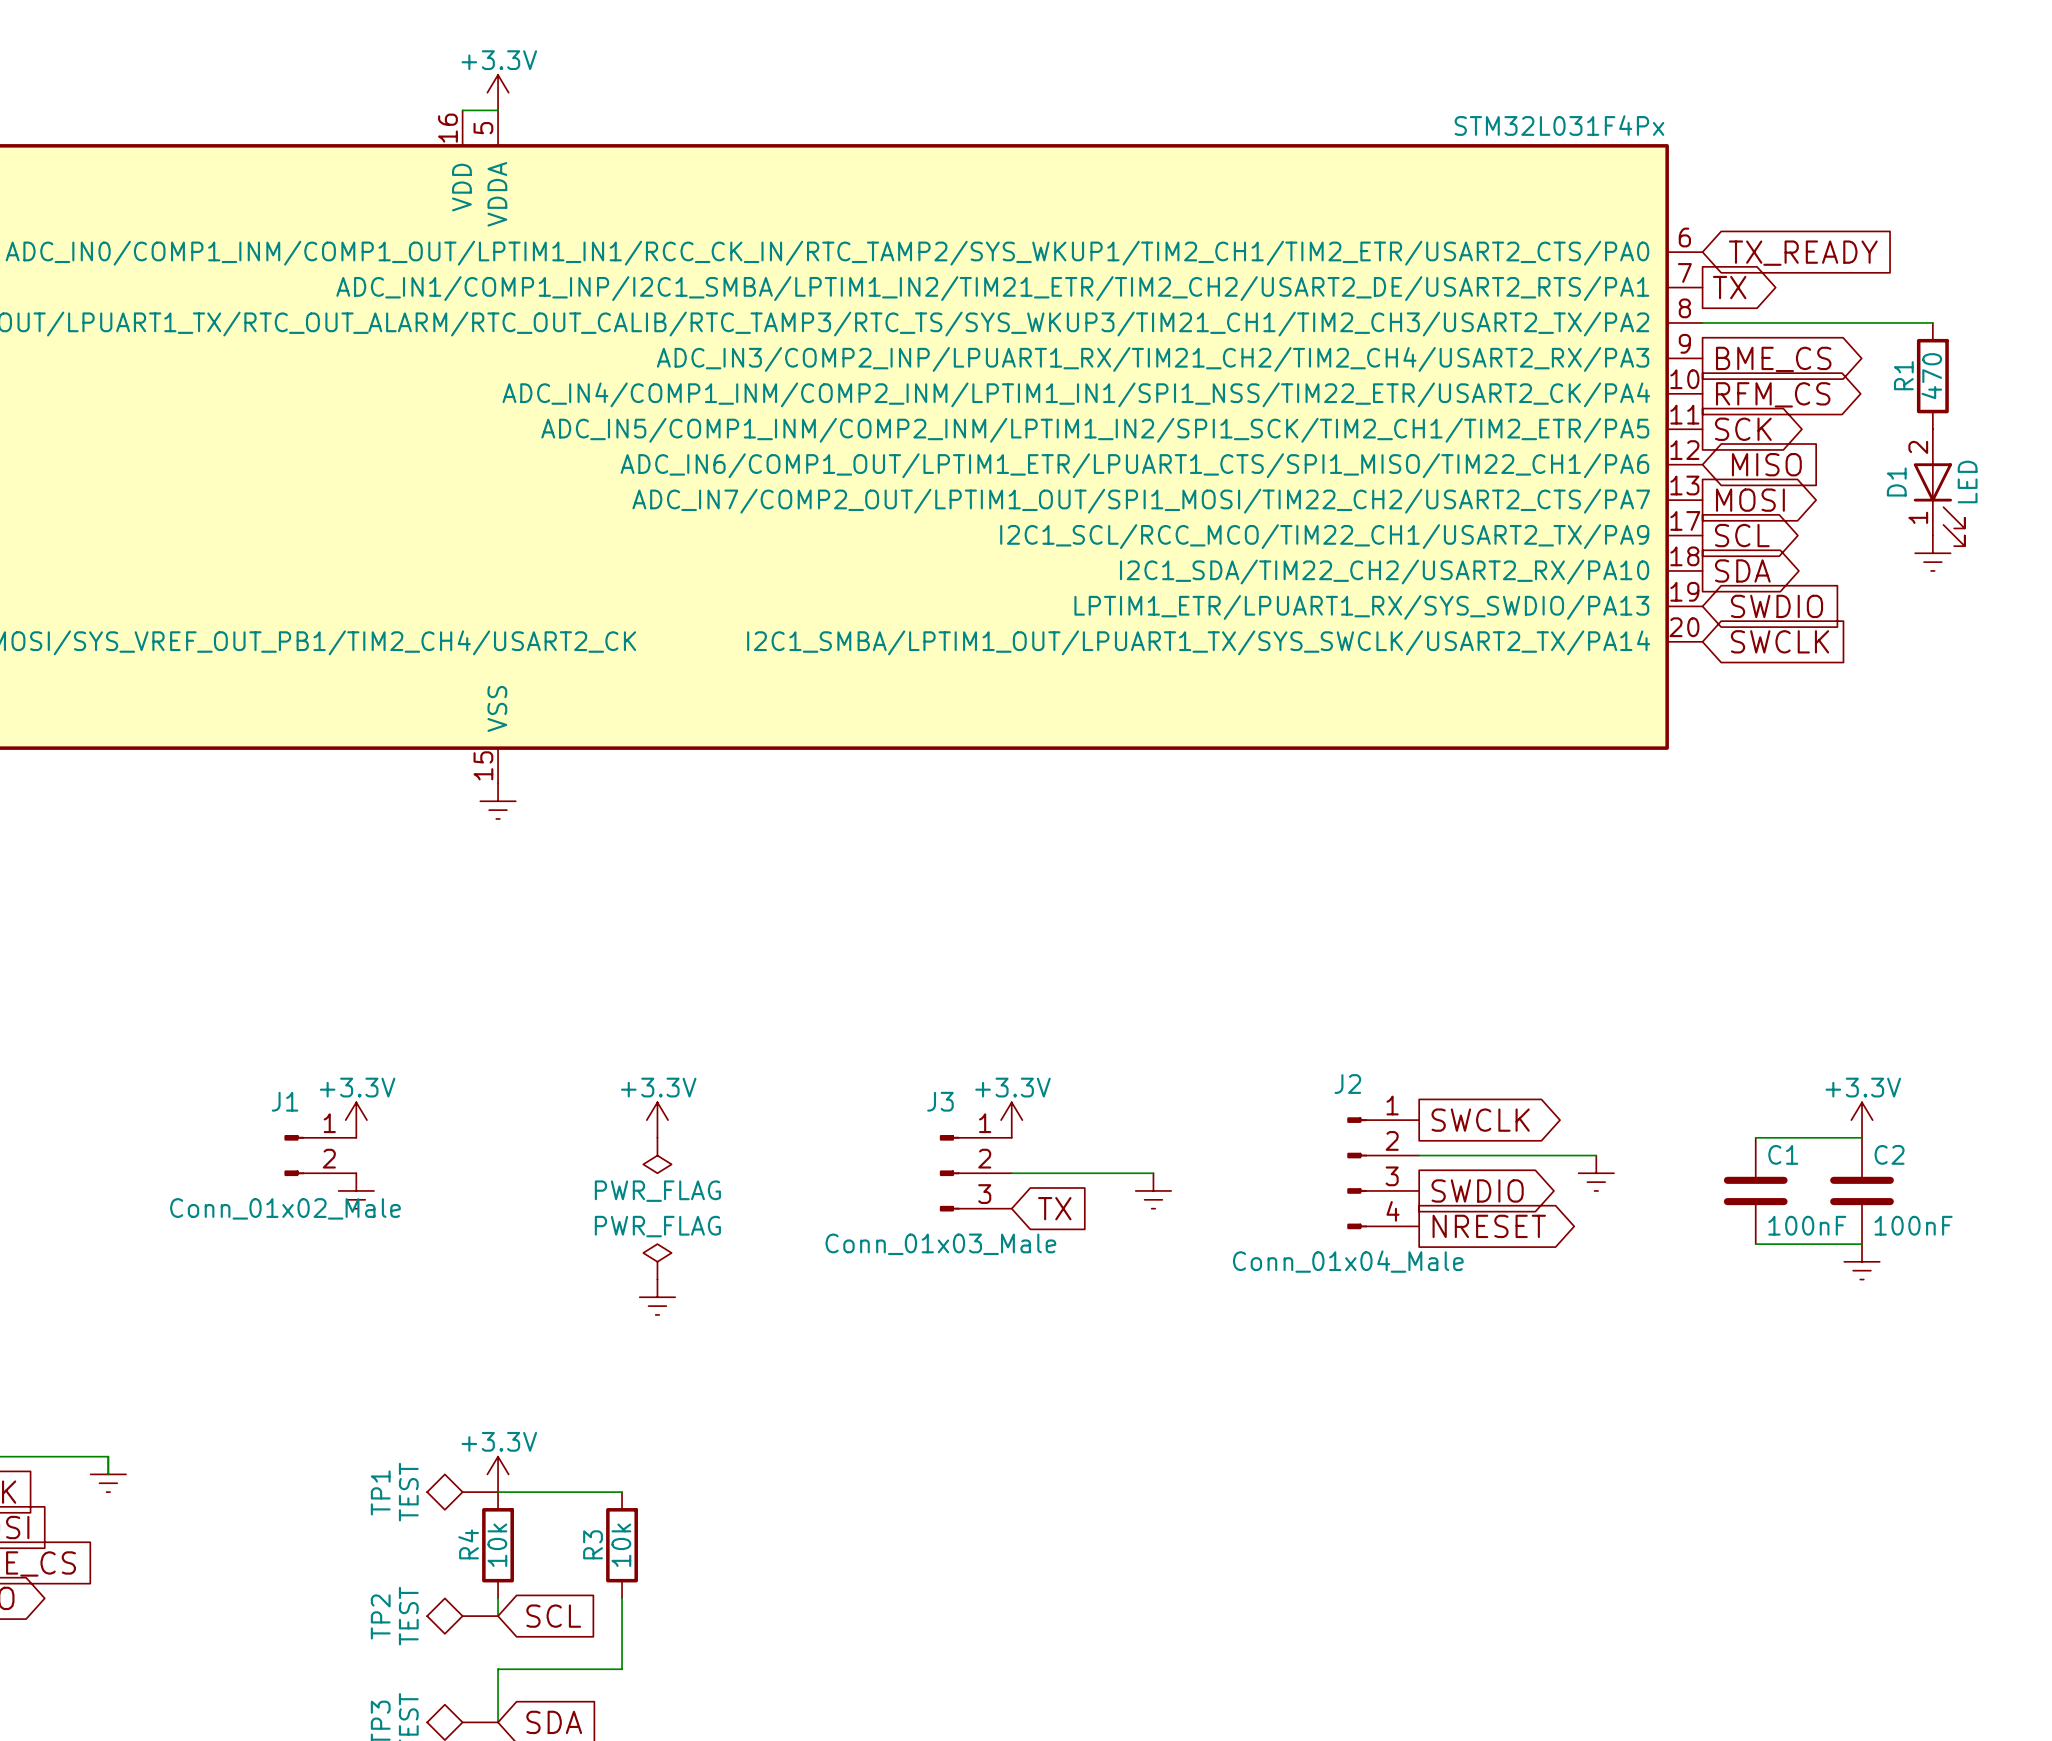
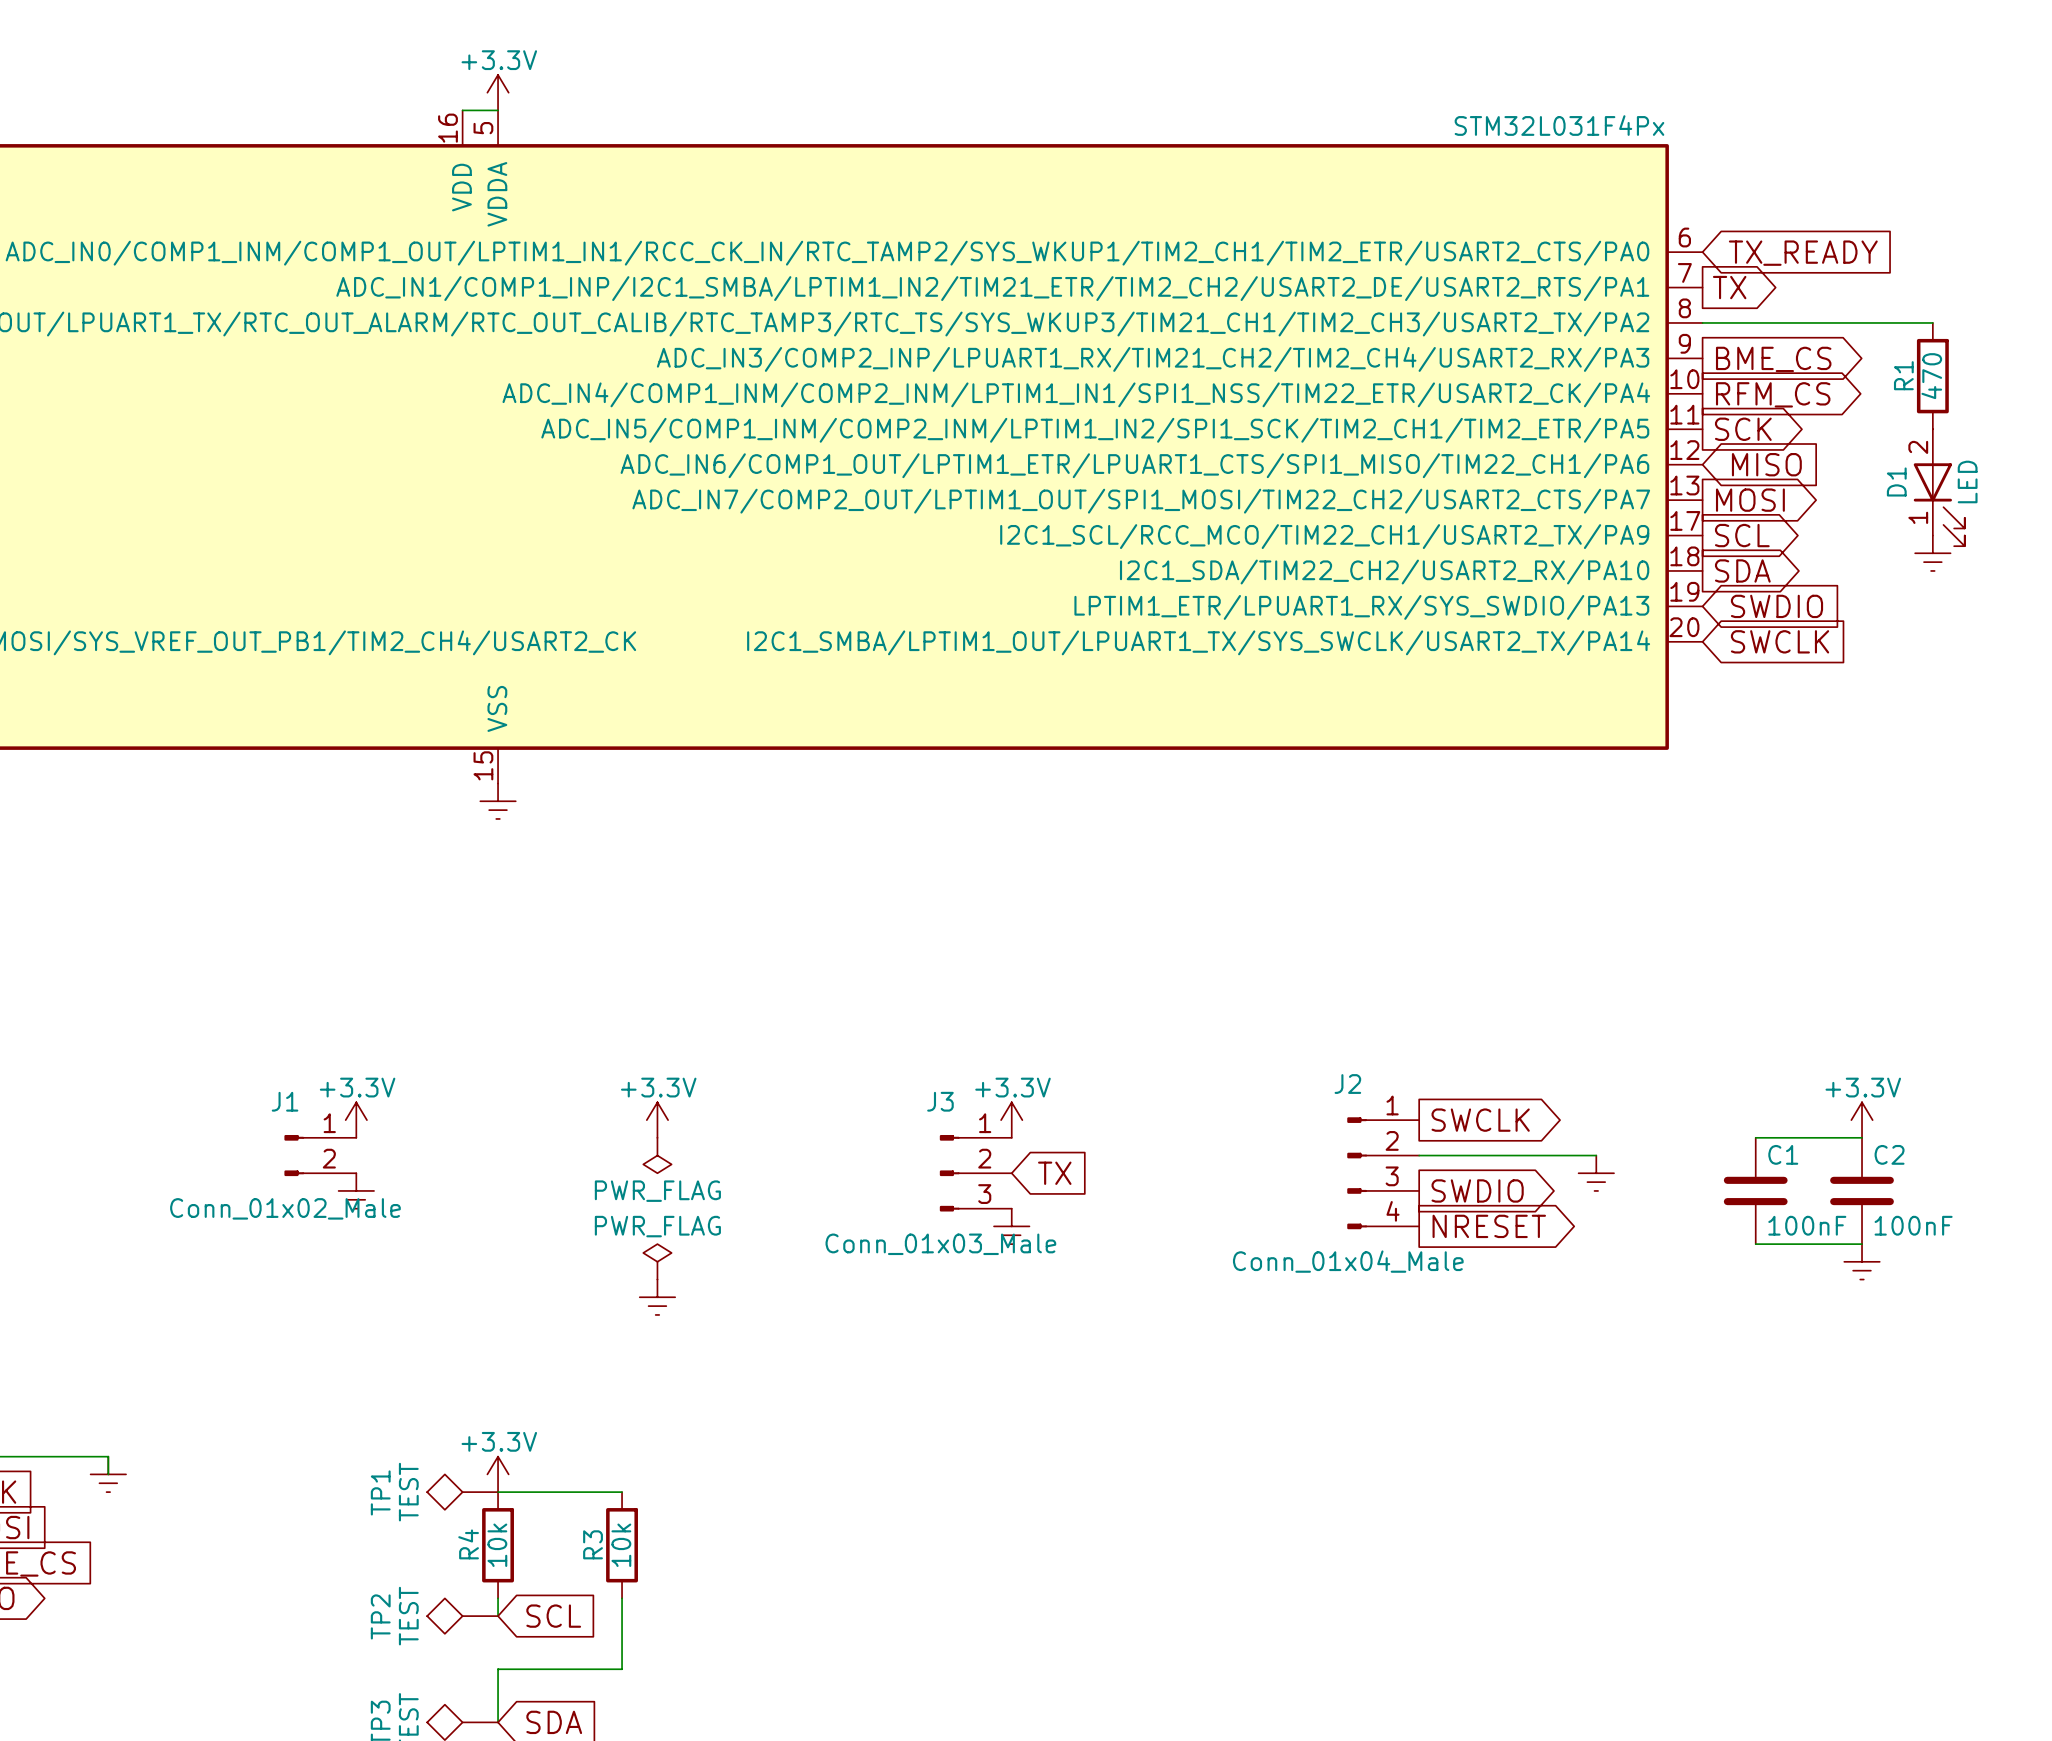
wire: (1011, 1173) (1153, 1173) -> none
power symbol position: (1153, 1190) -> (1011, 1226)
global label position: TX (1054, 1208) -> TX (1054, 1173)

